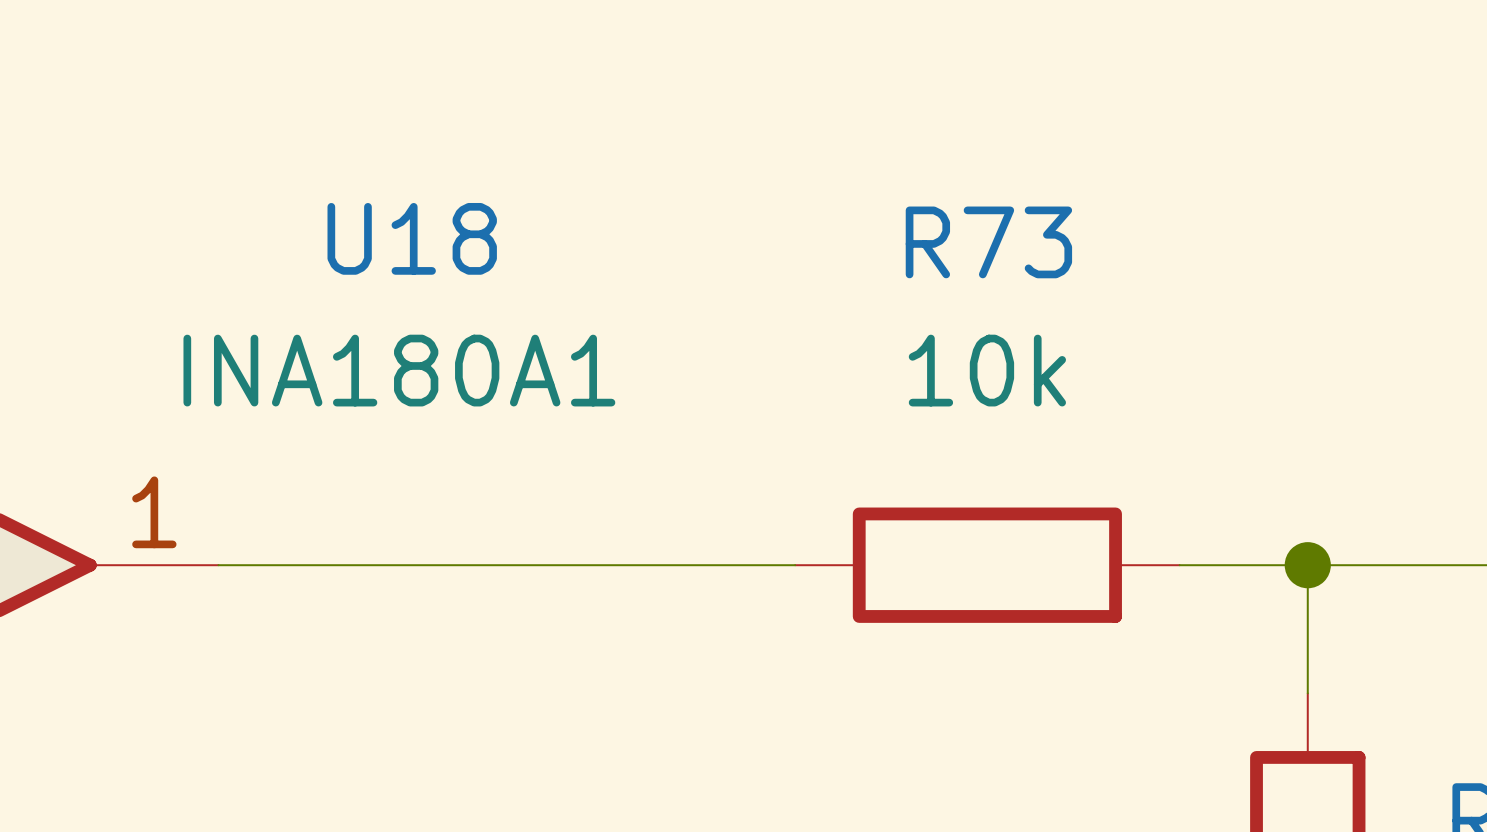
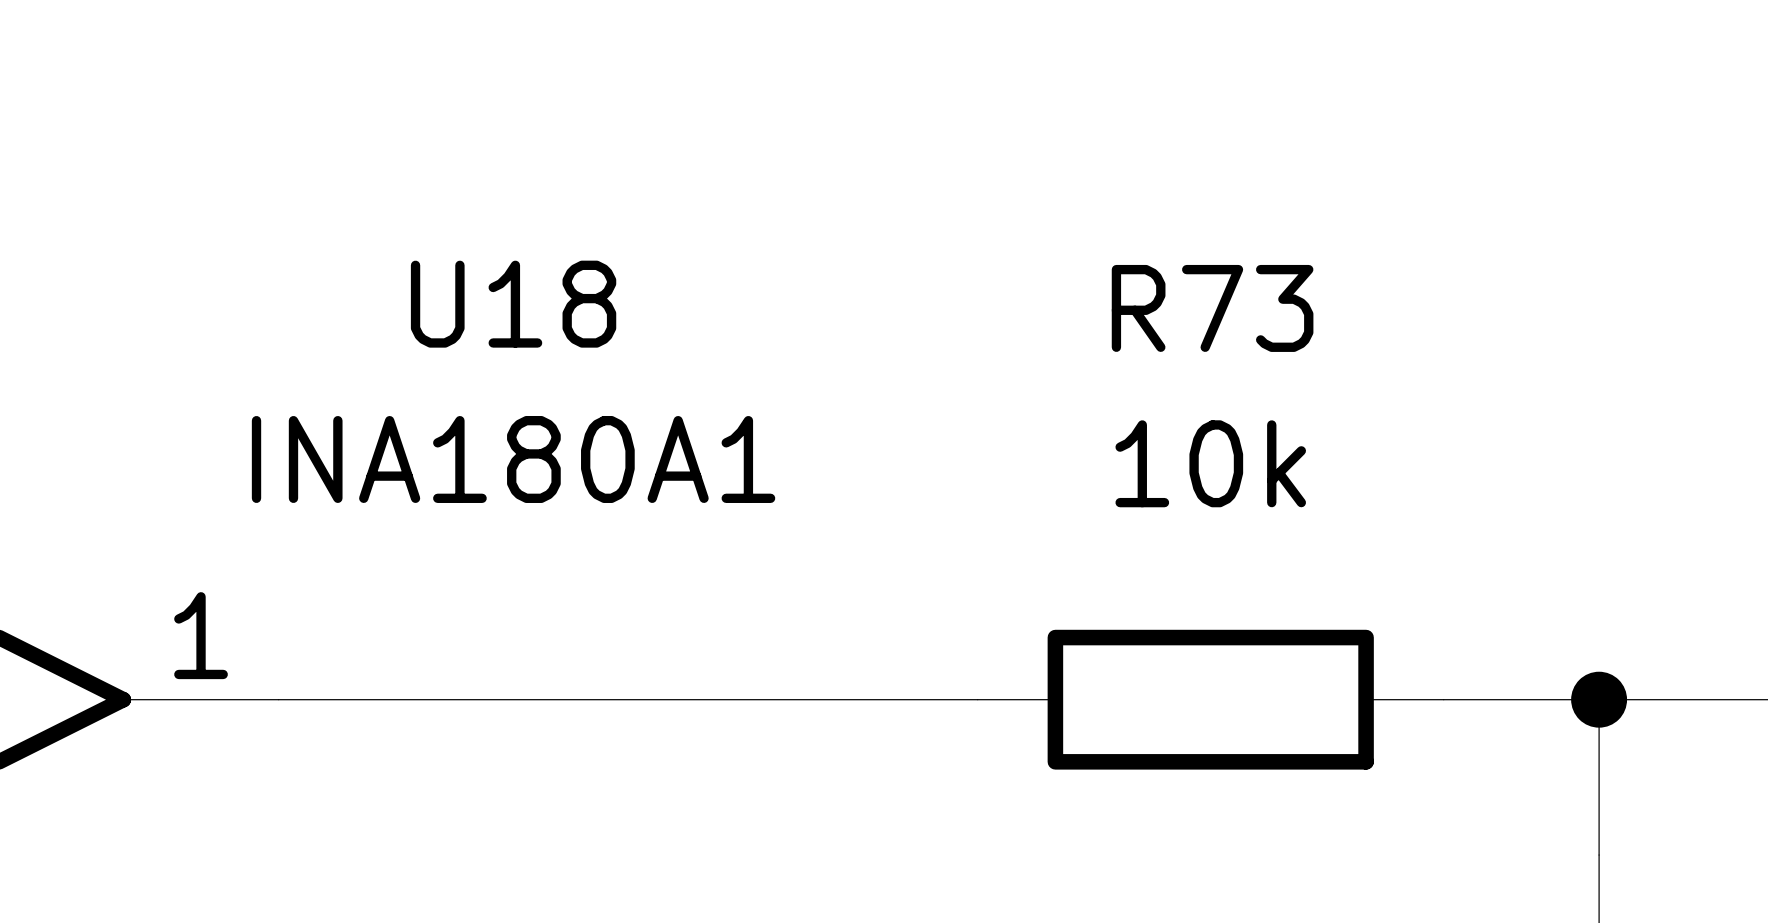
U18 value position: INA180A1 (399, 370) -> INA180A1 (513, 459)

